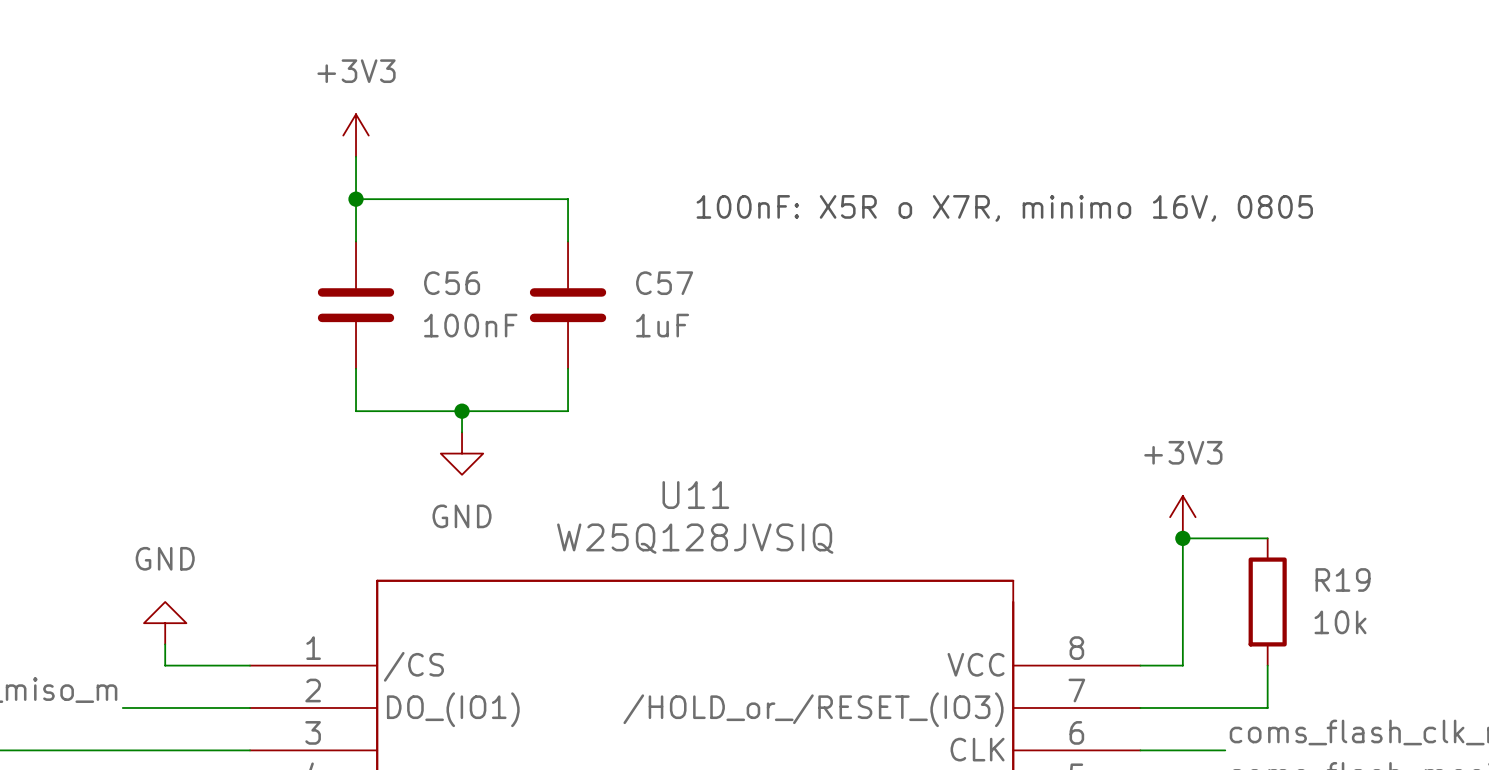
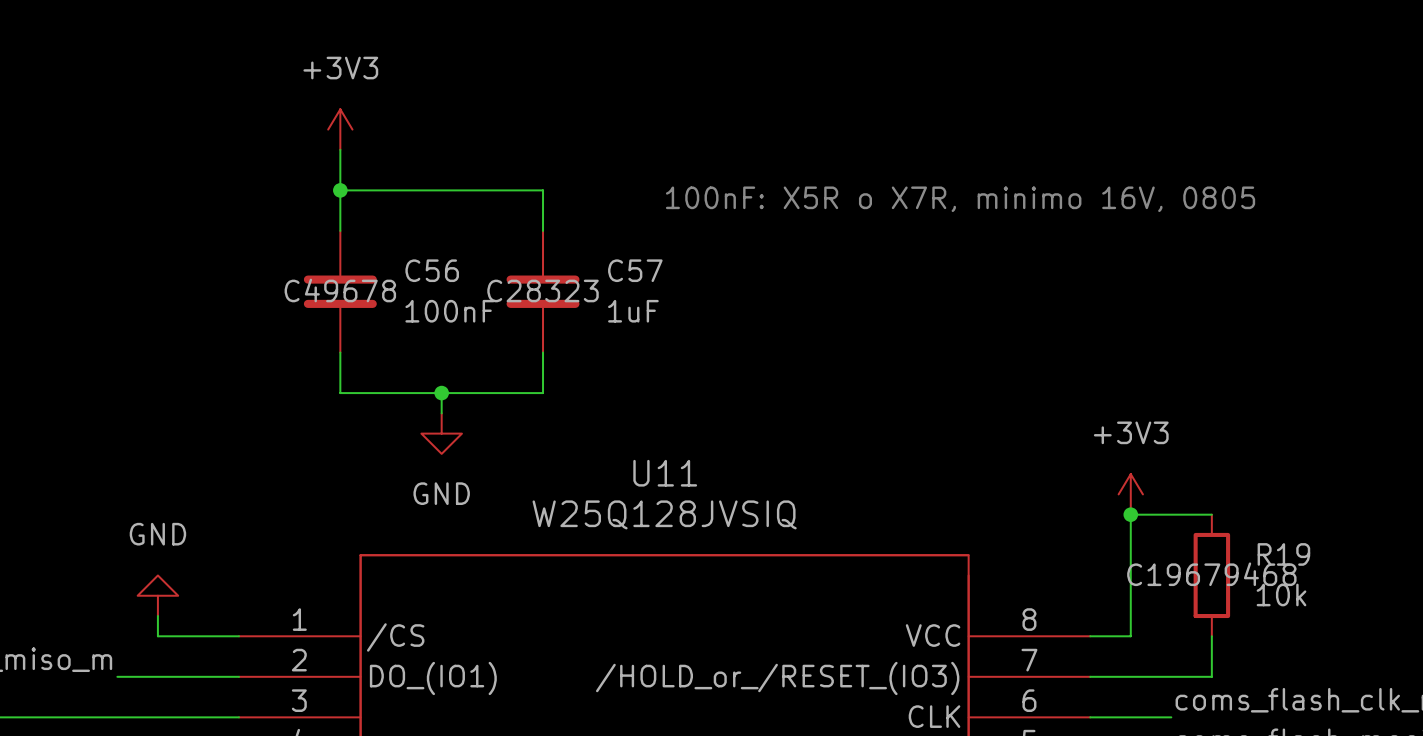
C56 text: none -> C49678 (340, 290)
C57 text: none -> C28323 (543, 290)
R19 text: none -> C19679468 (1211, 574)

